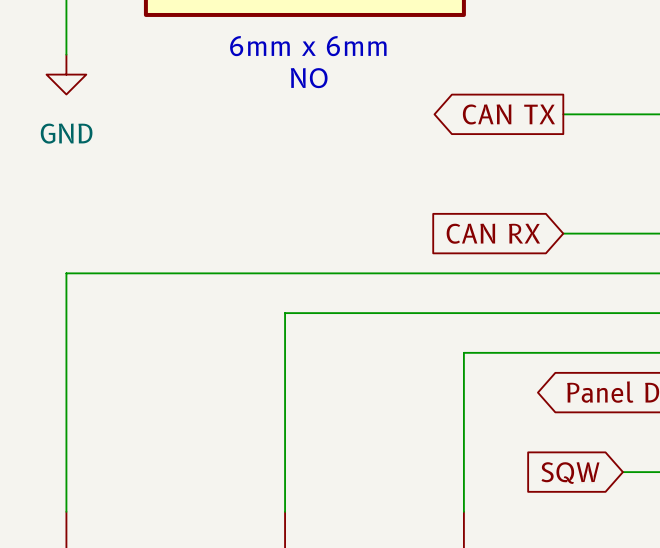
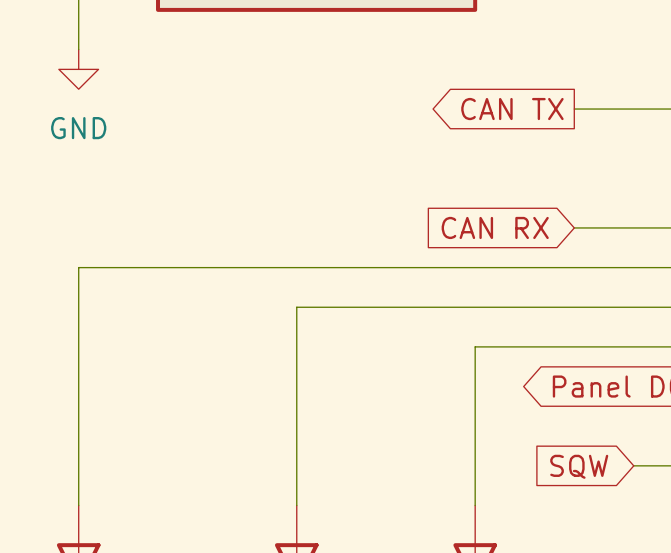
text: 6mm x 6mm (308, 46) -> none
text: NO (309, 78) -> none

